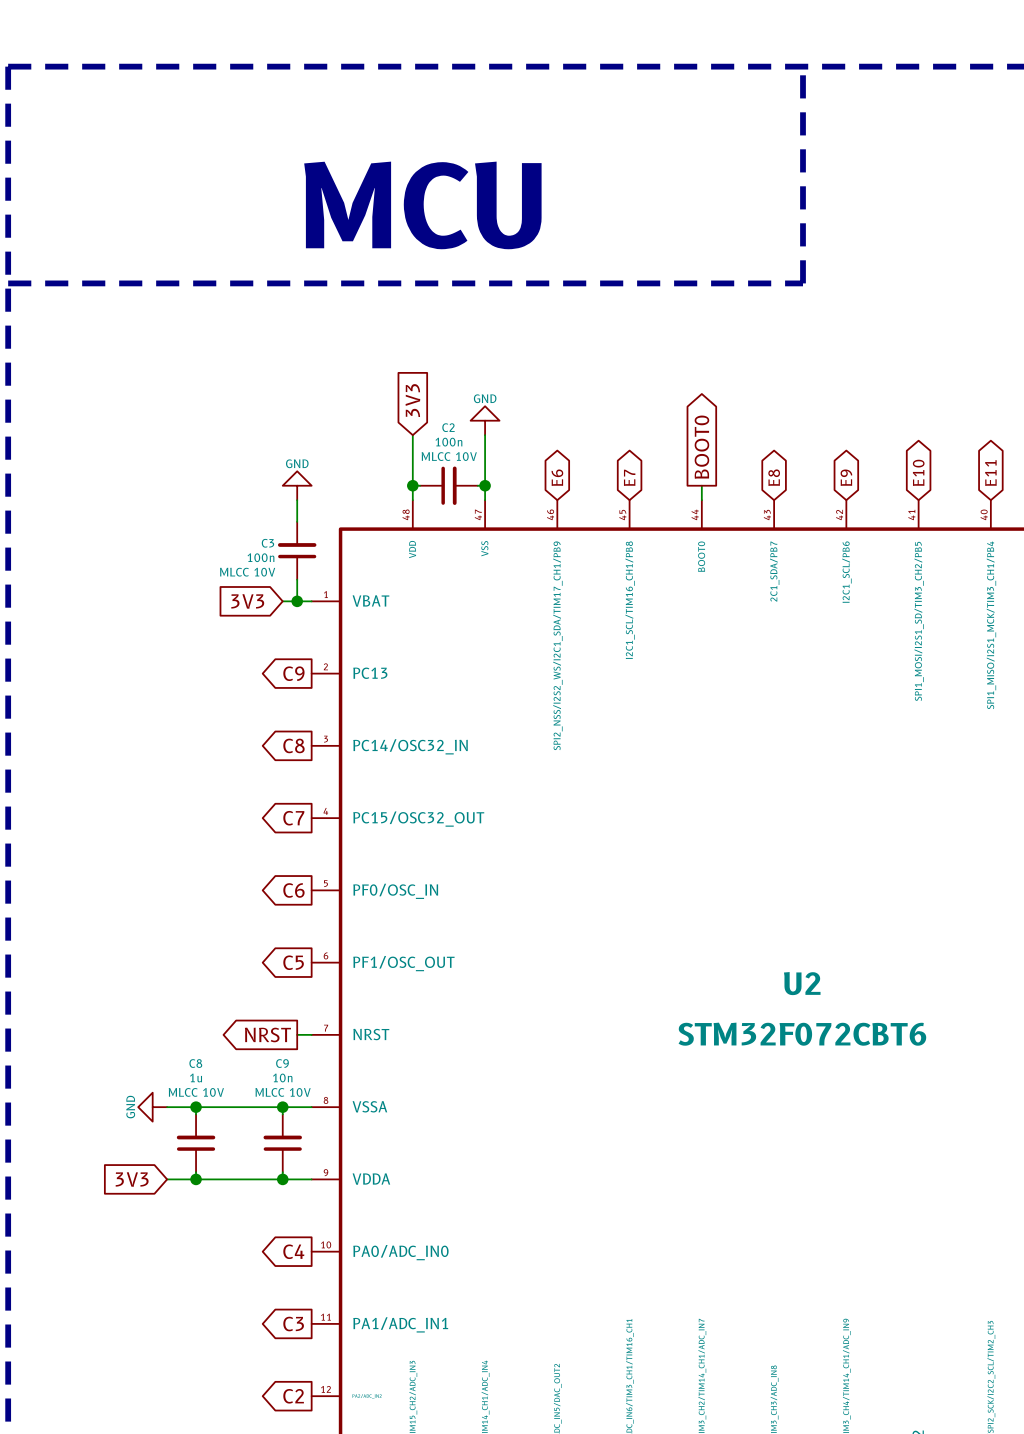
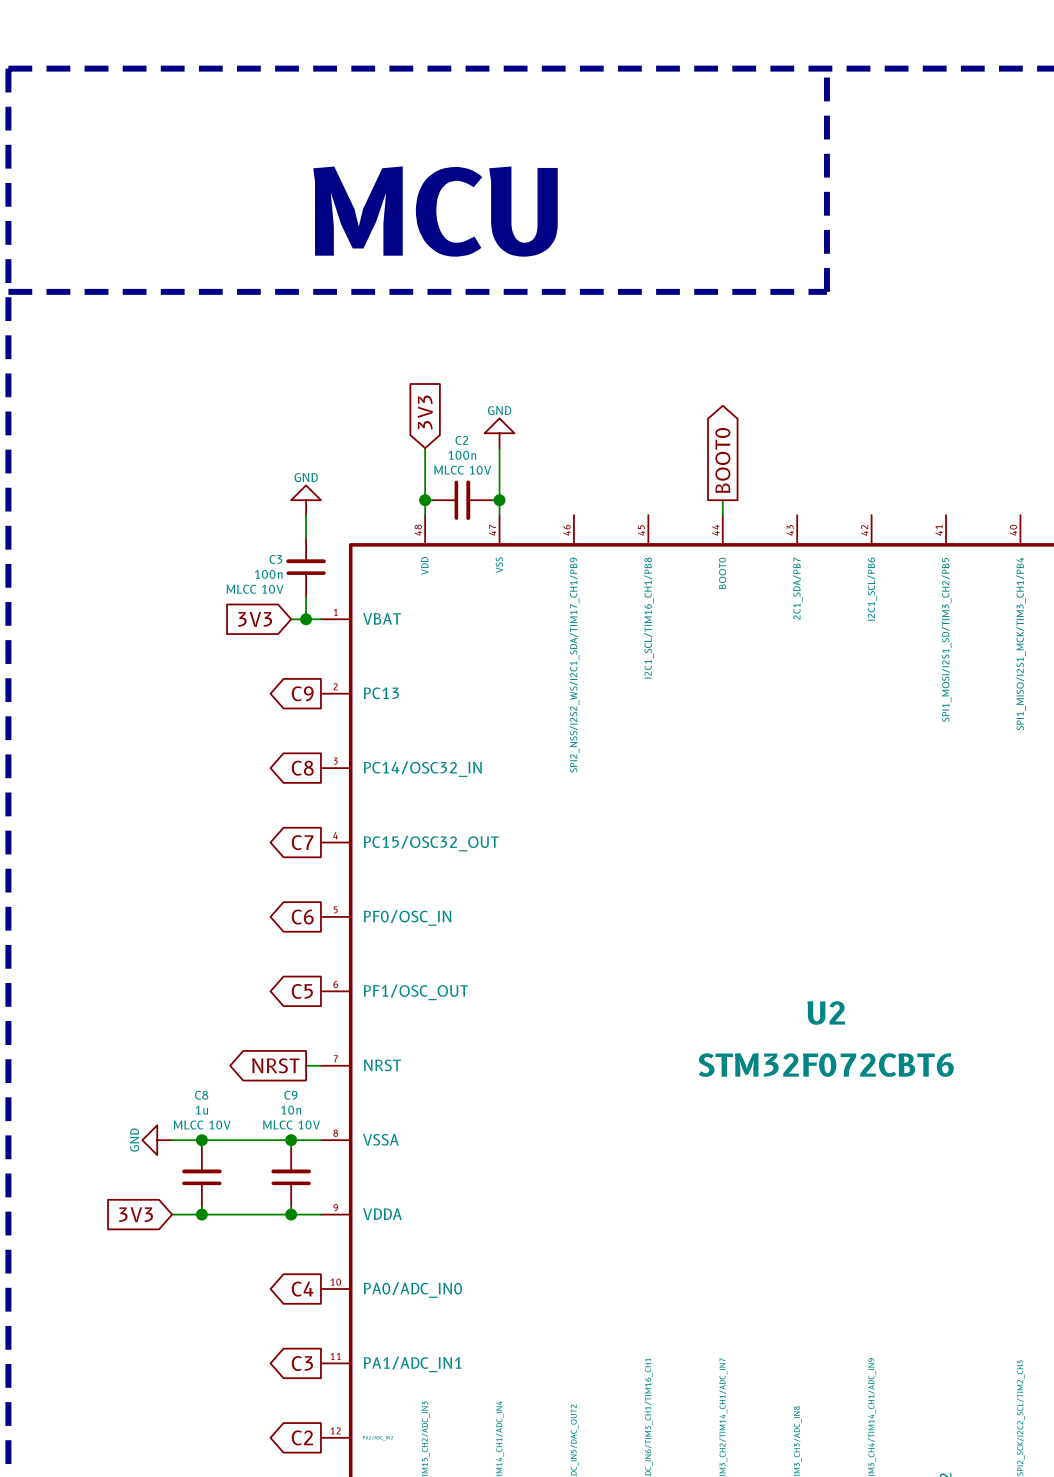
global label: E10 (918, 472) -> none
global label: E11 (990, 473) -> none
global label: E6 (557, 477) -> none
global label: E7 (629, 477) -> none
global label: E8 (774, 477) -> none
global label: E9 (846, 477) -> none

